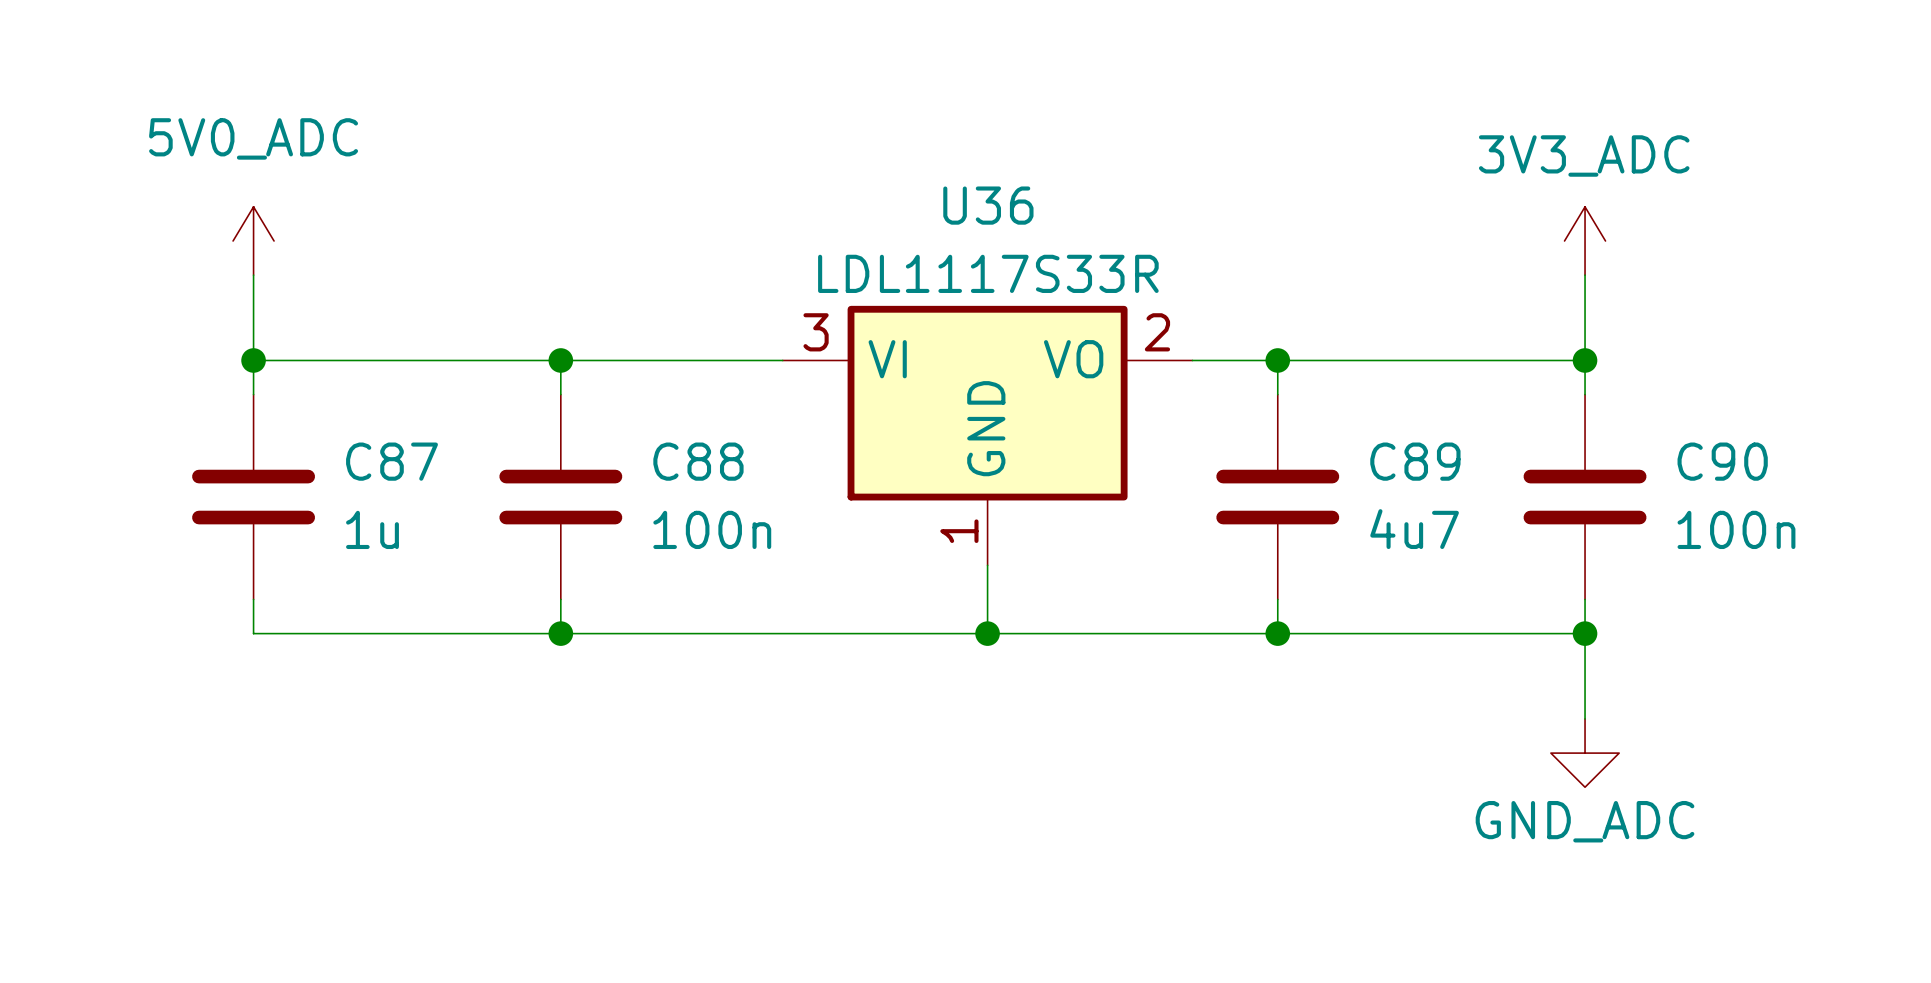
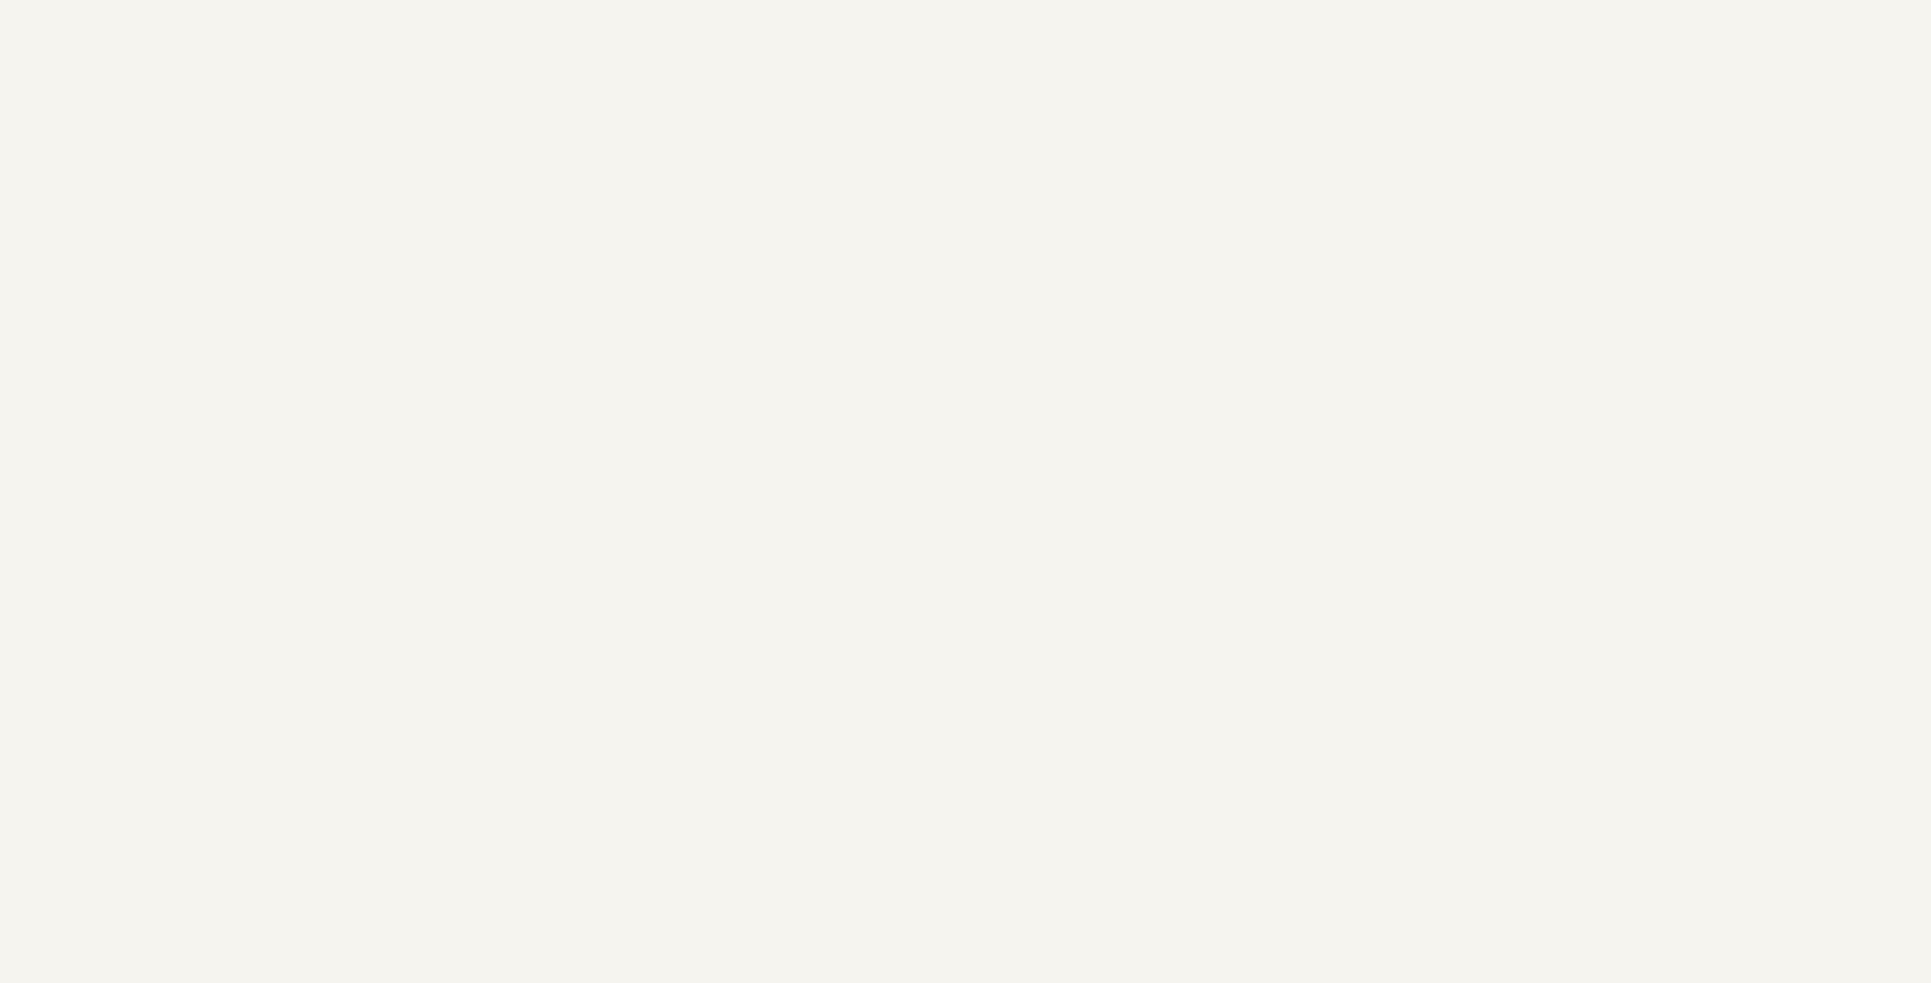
power symbol: 5V0_ADC (253, 240) -> none
power symbol: 3V3_ADC (1585, 240) -> none
wire: (253, 275) (253, 394) -> none
wire: (1585, 275) (1585, 394) -> none
wire: (253, 360) (782, 360) -> none
junction: (253, 360) -> none
wire: (560, 360) (560, 394) -> none
junction: (560, 360) -> none
wire: (1192, 360) (1585, 360) -> none
wire: (1277, 360) (1277, 394) -> none
junction: (1277, 360) -> none
junction: (1585, 360) -> none
U36: LDL1117S33R (987, 435) -> none
C87: 1u (253, 497) -> none
C88: 100n (560, 497) -> none
C89: 4u7 (1277, 497) -> none
C90: 100n (1585, 497) -> none
wire: (987, 565) (987, 633) -> none
wire: (253, 599) (253, 633) (1585, 633) -> none
wire: (560, 599) (560, 633) -> none
wire: (1277, 599) (1277, 633) -> none
wire: (1585, 599) (1585, 718) -> none
junction: (560, 633) -> none
junction: (987, 633) -> none
junction: (1277, 633) -> none
junction: (1585, 633) -> none
power symbol: GND_ADC (1585, 753) -> none

